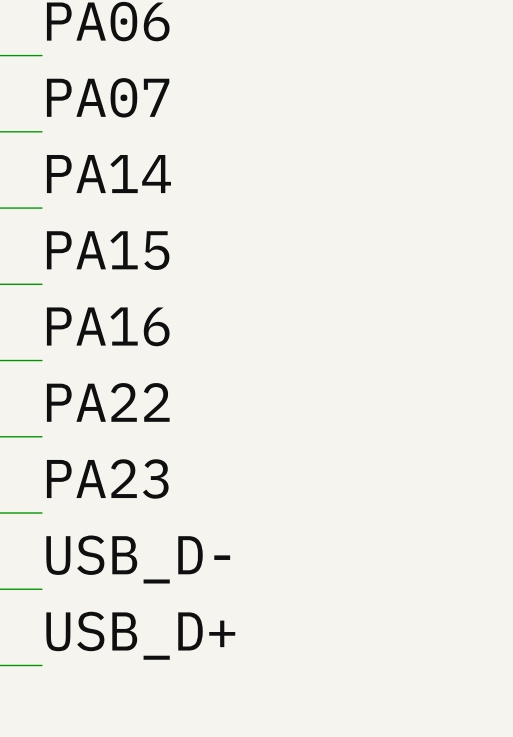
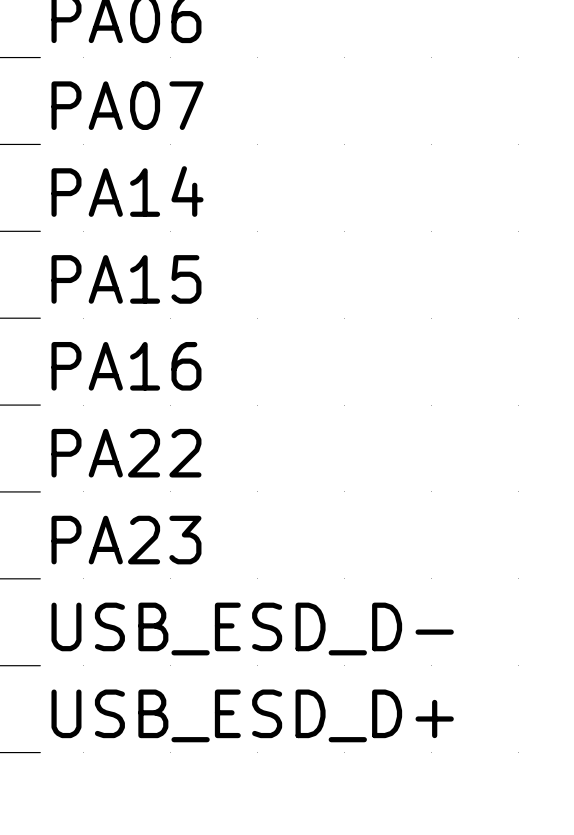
label: USB_D- (138, 559) -> USB_ESD_D- (252, 629)
label: USB_D+ (140, 635) -> USB_ESD_D+ (252, 715)

